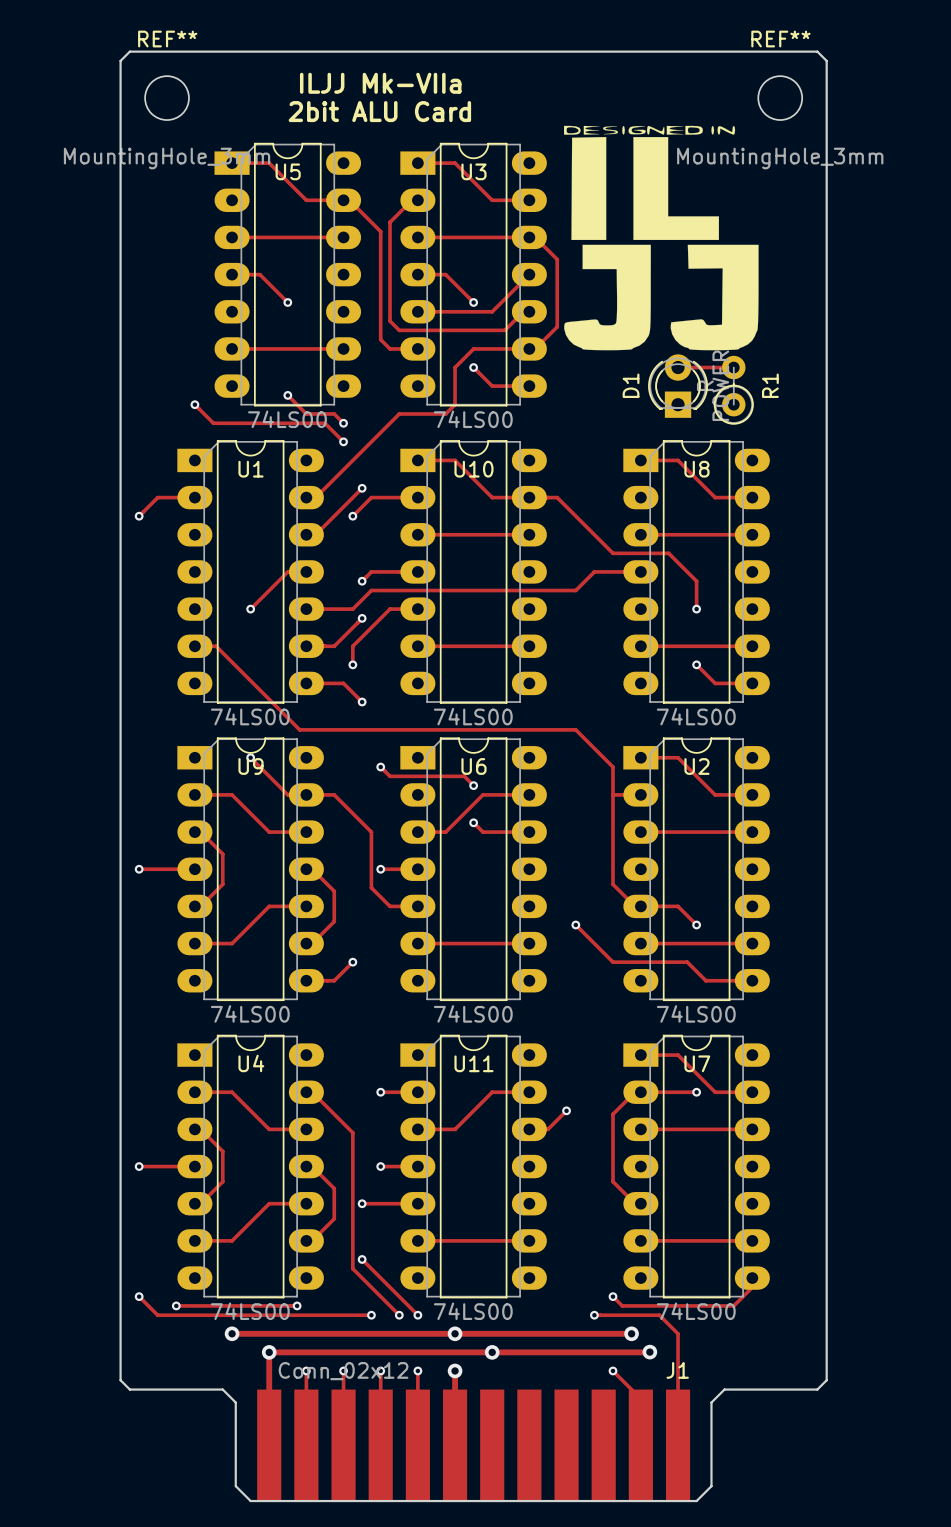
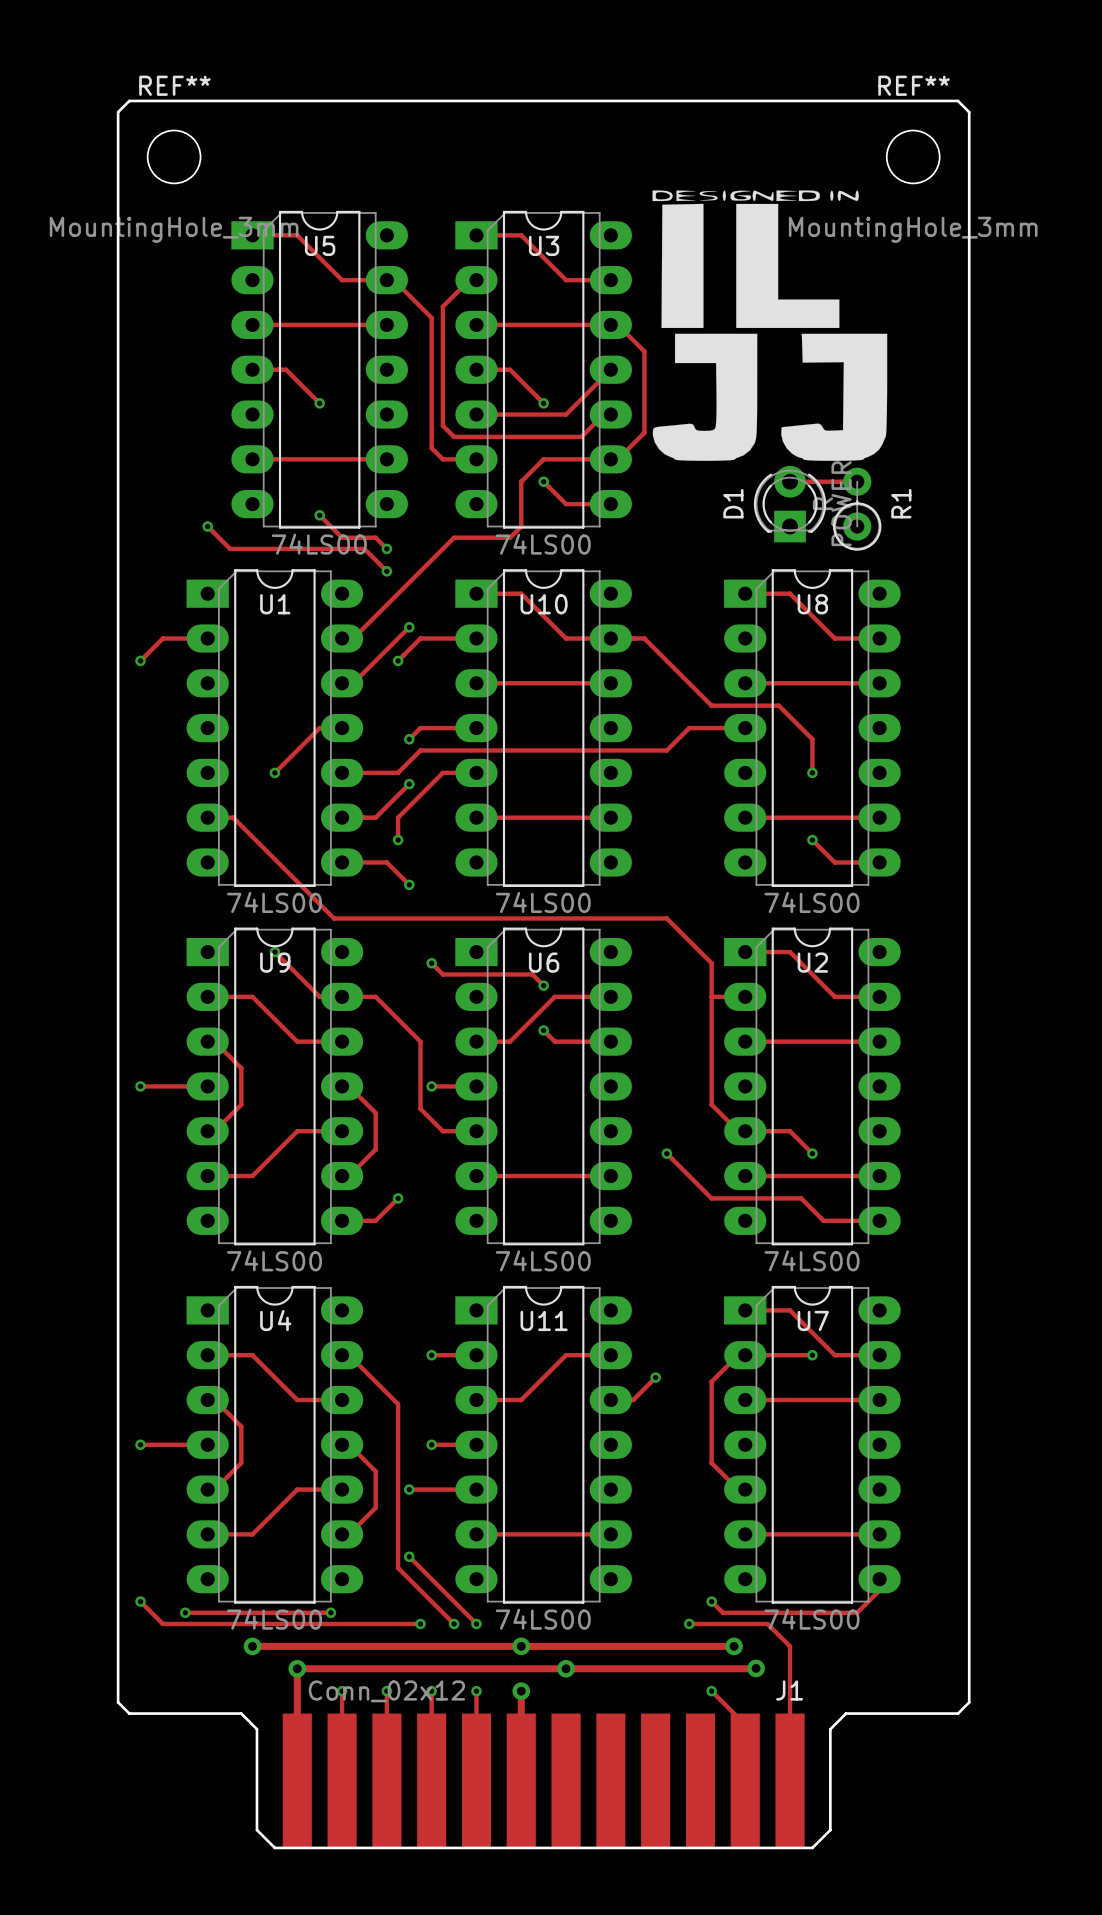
text: ILJJ Mk-VIIa (380, 83) -> none
text: 2bit ALU Card (379, 111) -> none

